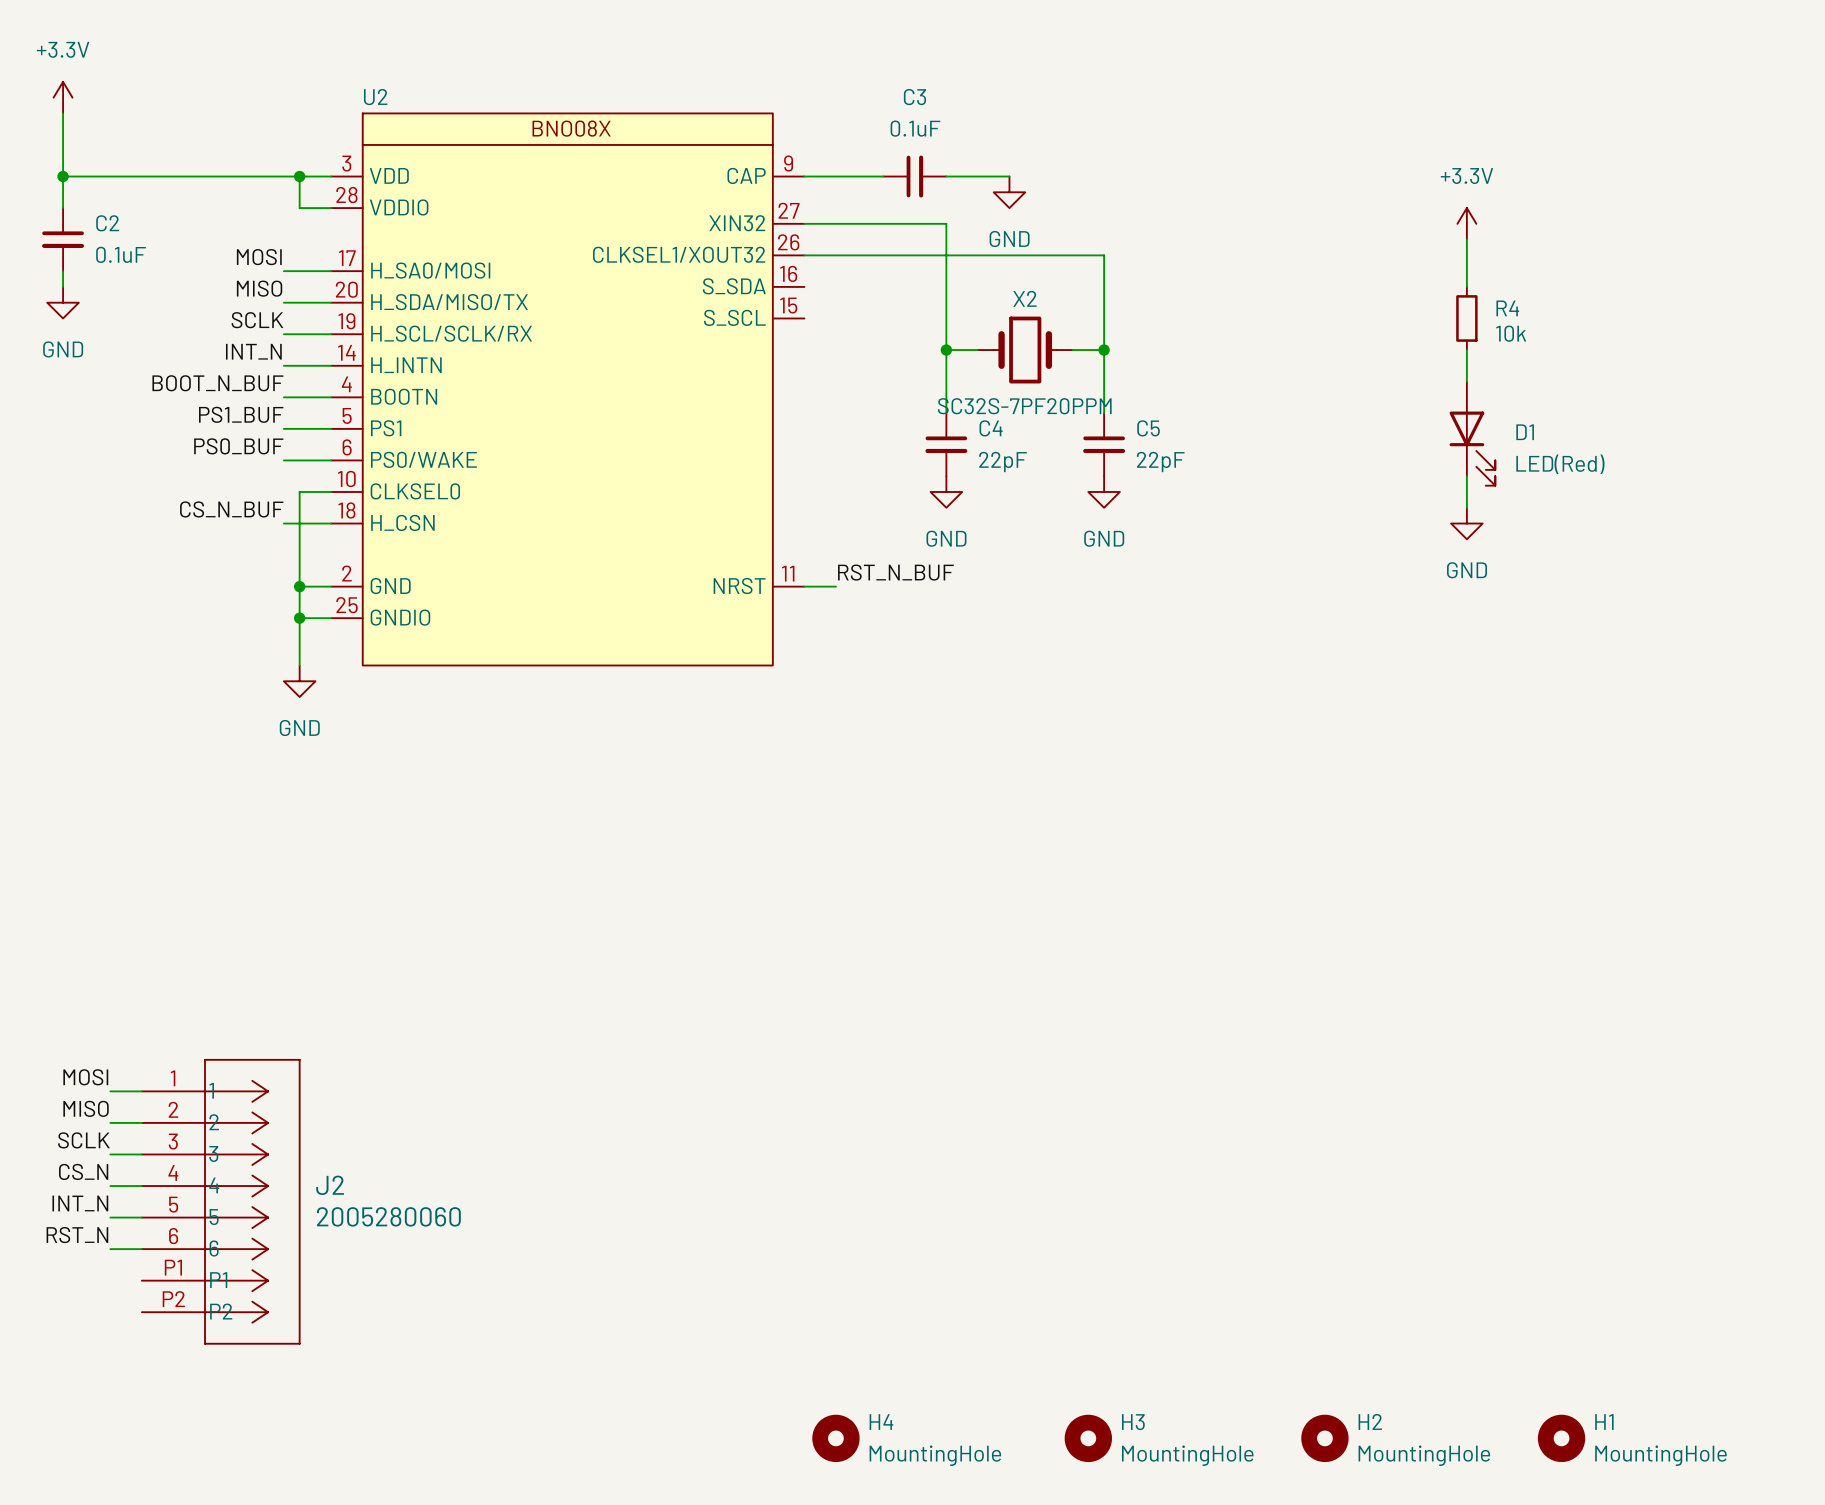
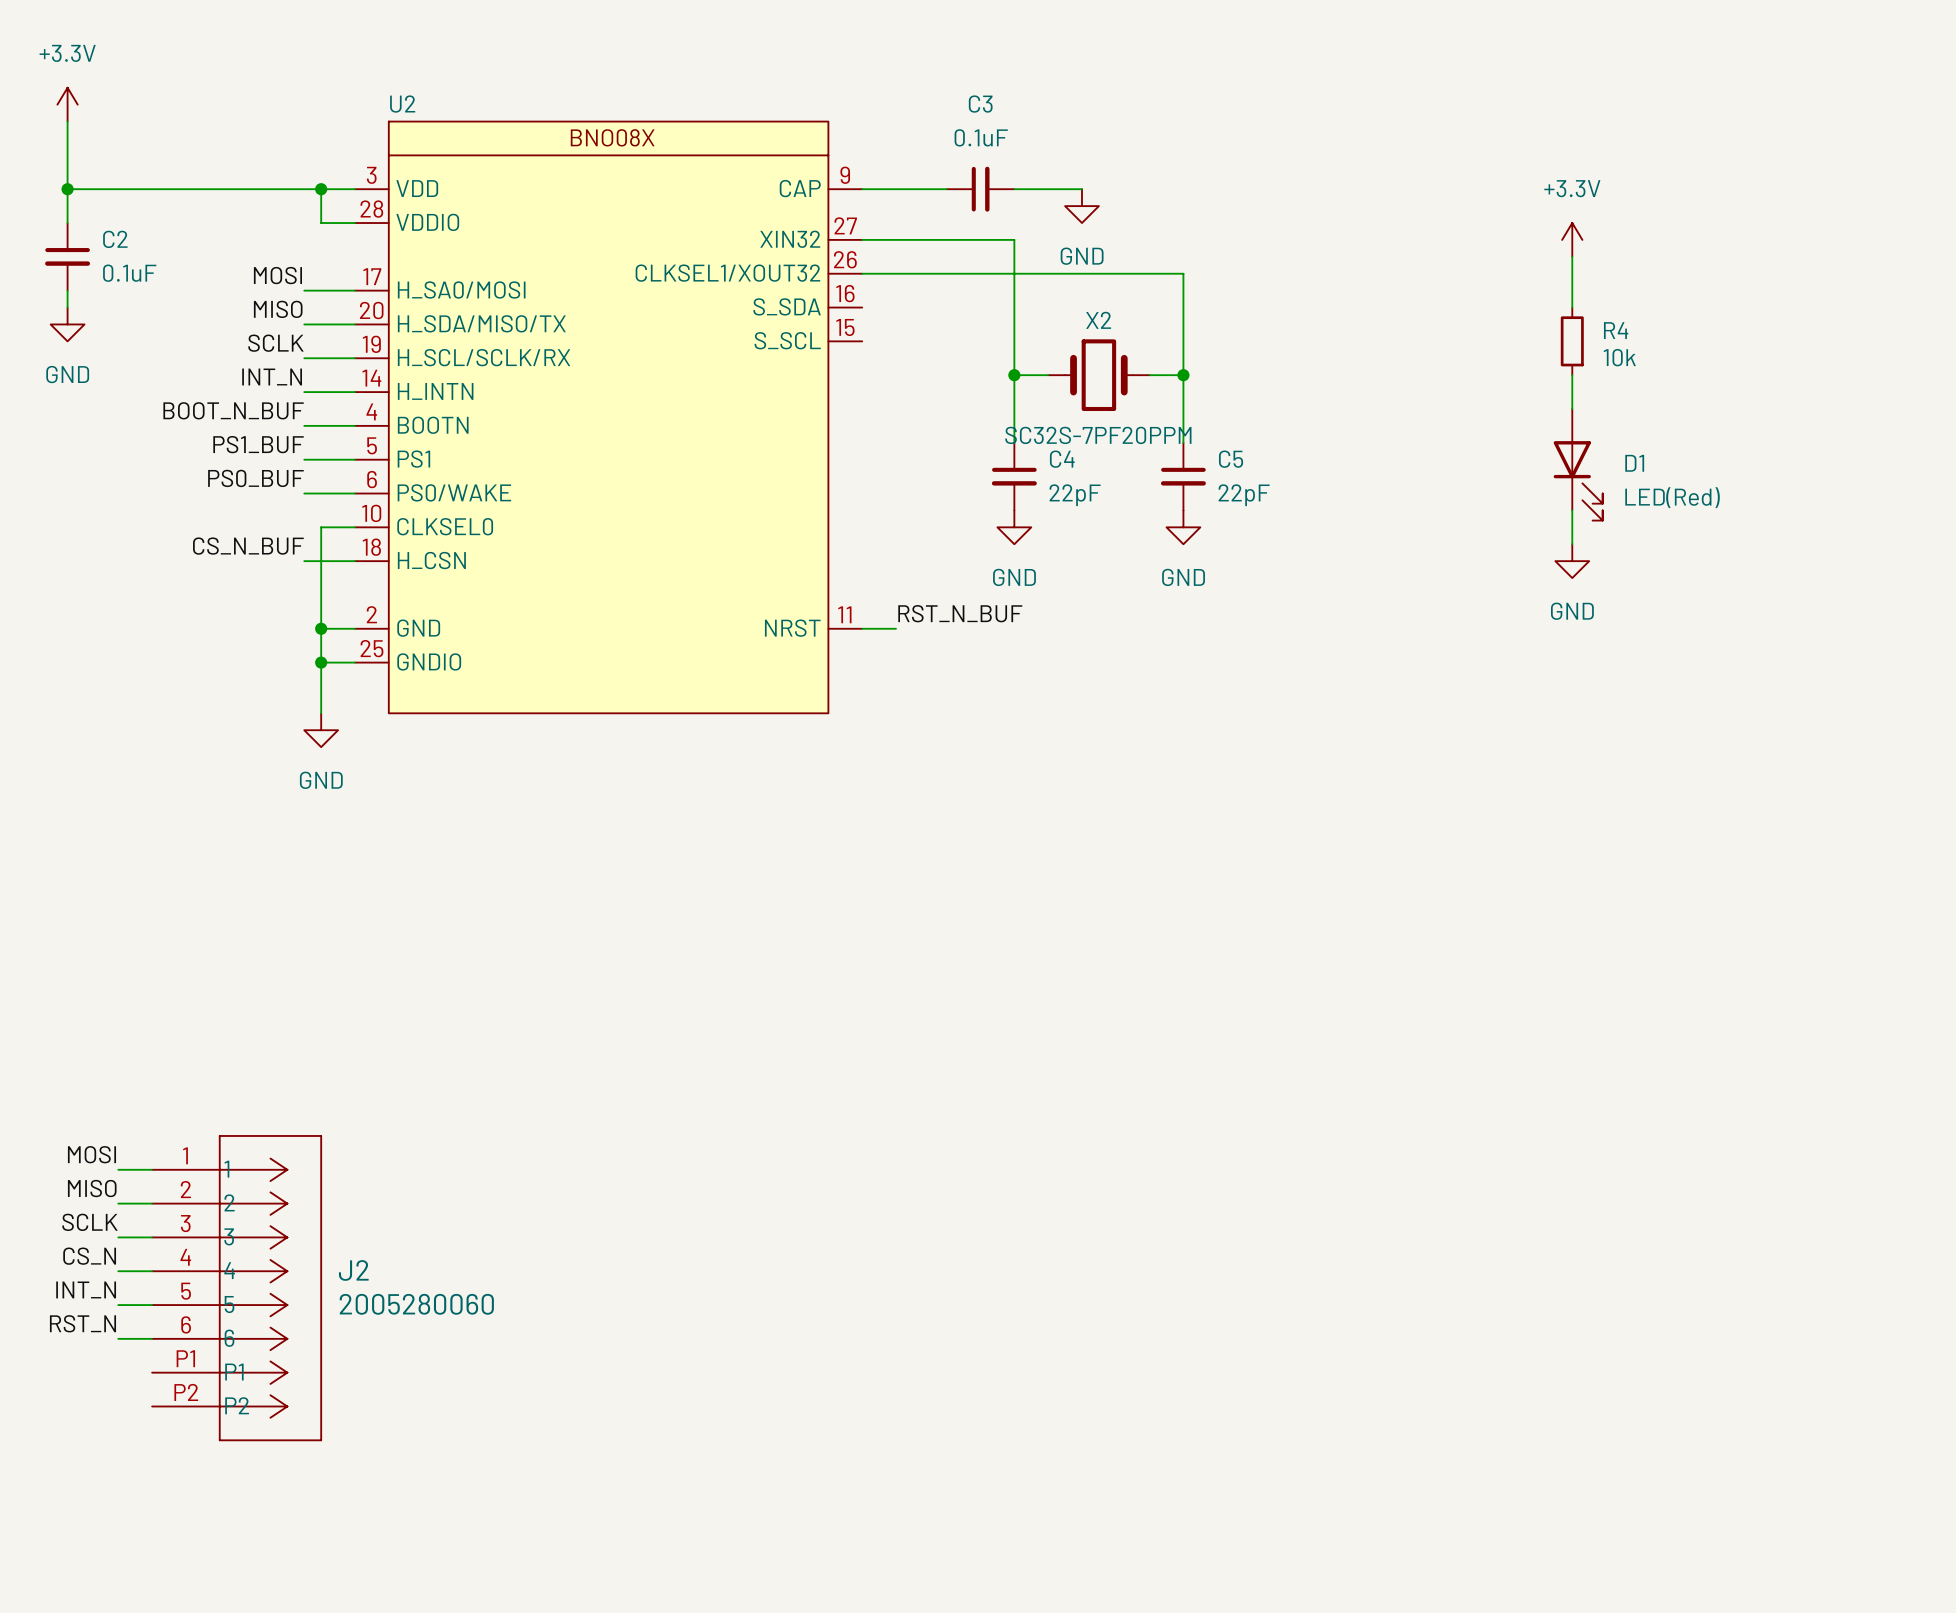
H4: MountingHole (835, 1438) -> none
H3: MountingHole (1088, 1438) -> none
H2: MountingHole (1324, 1438) -> none
H1: MountingHole (1561, 1438) -> none

